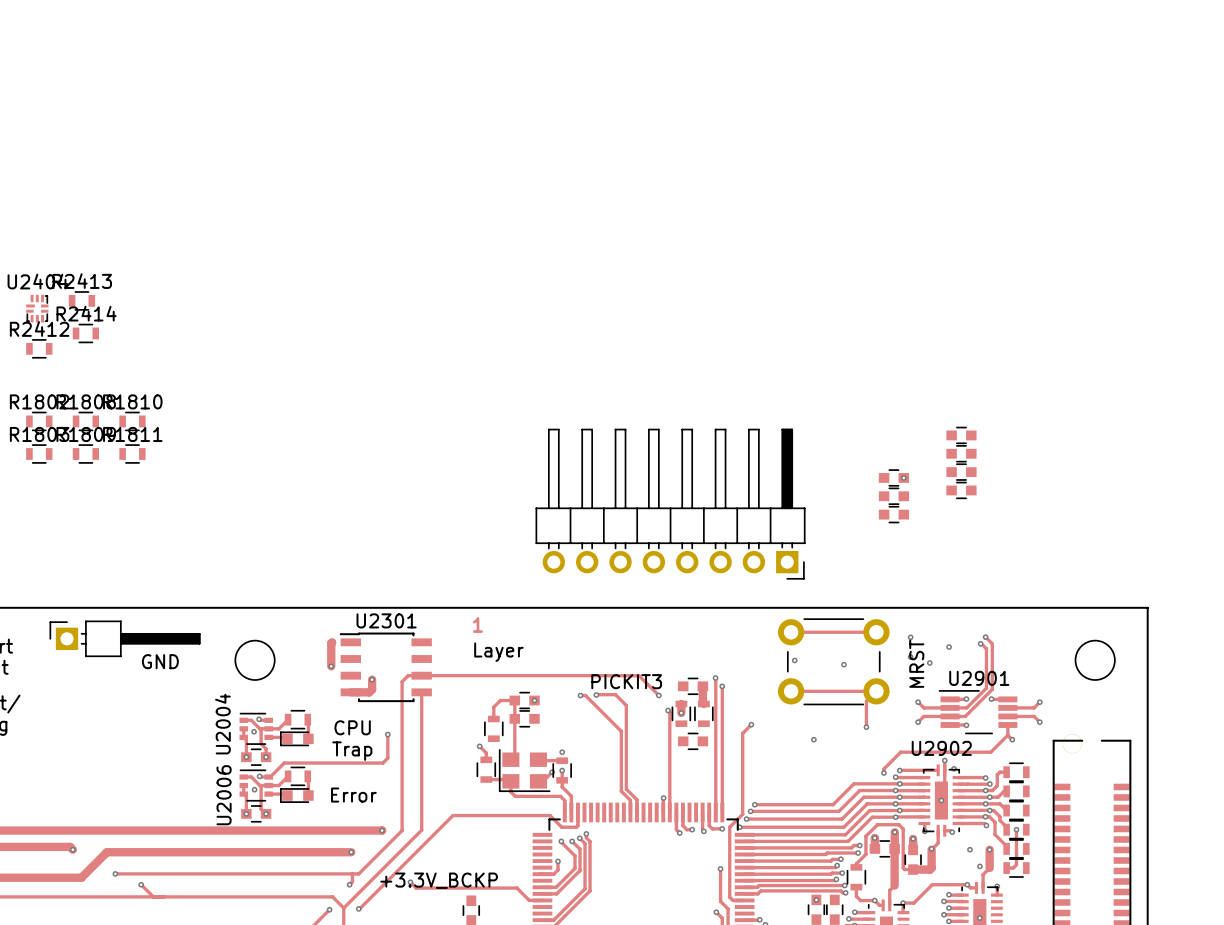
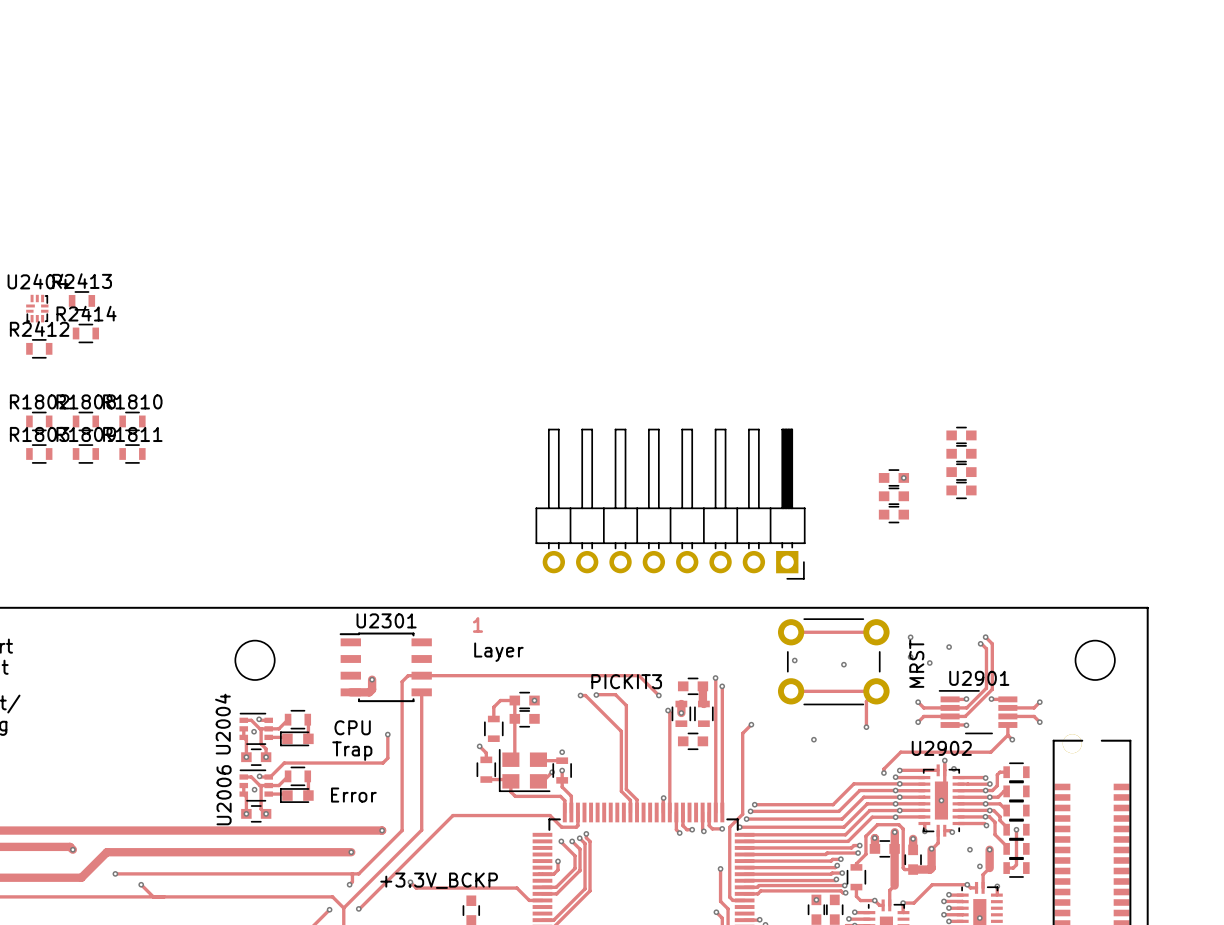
part: (124, 638) -> none
track: (332, 642) (331, 666) -> none
text: GND (160, 661) -> none
via: (331, 666) -> none

